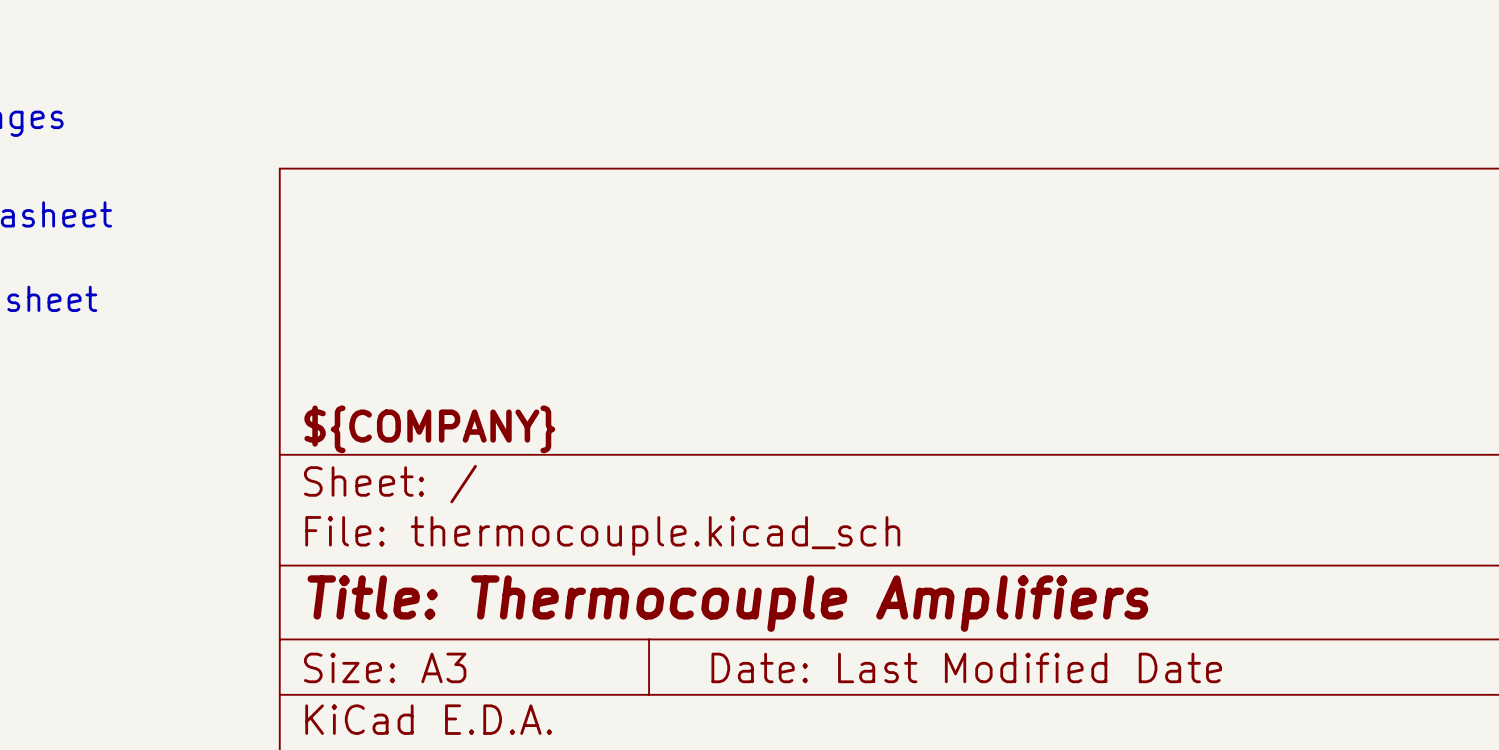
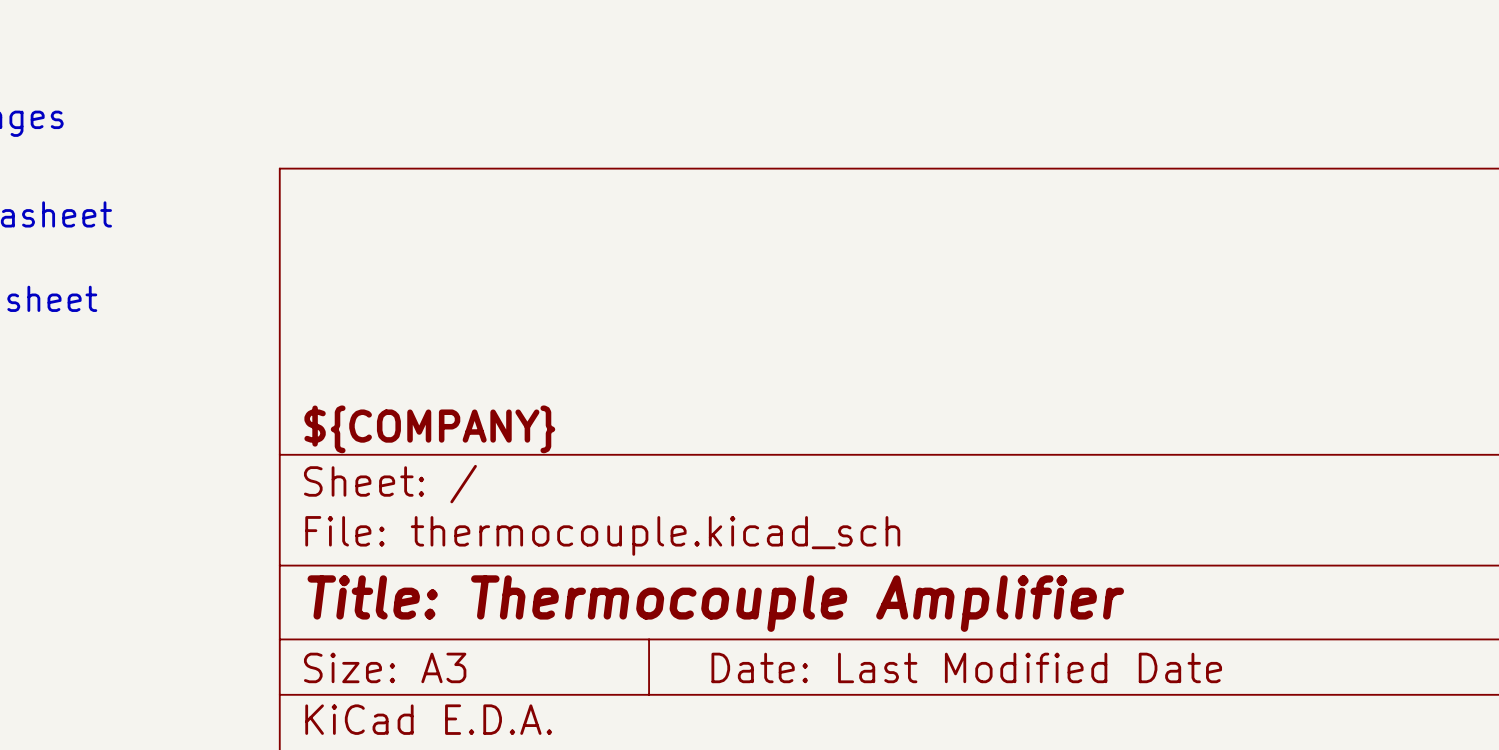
title block: Title: Thermocouple Amplifiers (727, 603) -> Title: Thermocouple Amplifier (715, 603)

